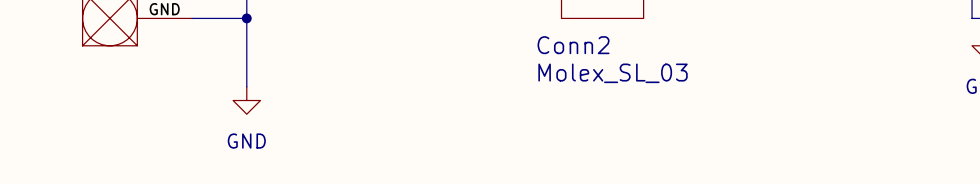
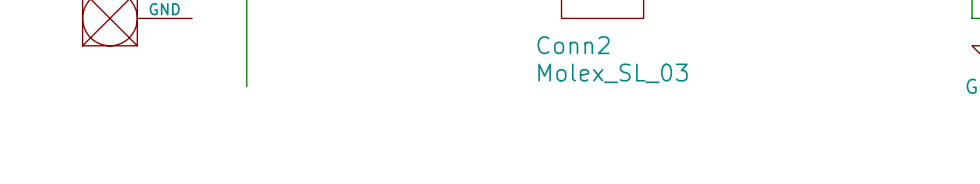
wire: (192, 18) (246, 18) -> none
junction: (246, 18) -> none
power symbol: GND (246, 100) -> none

